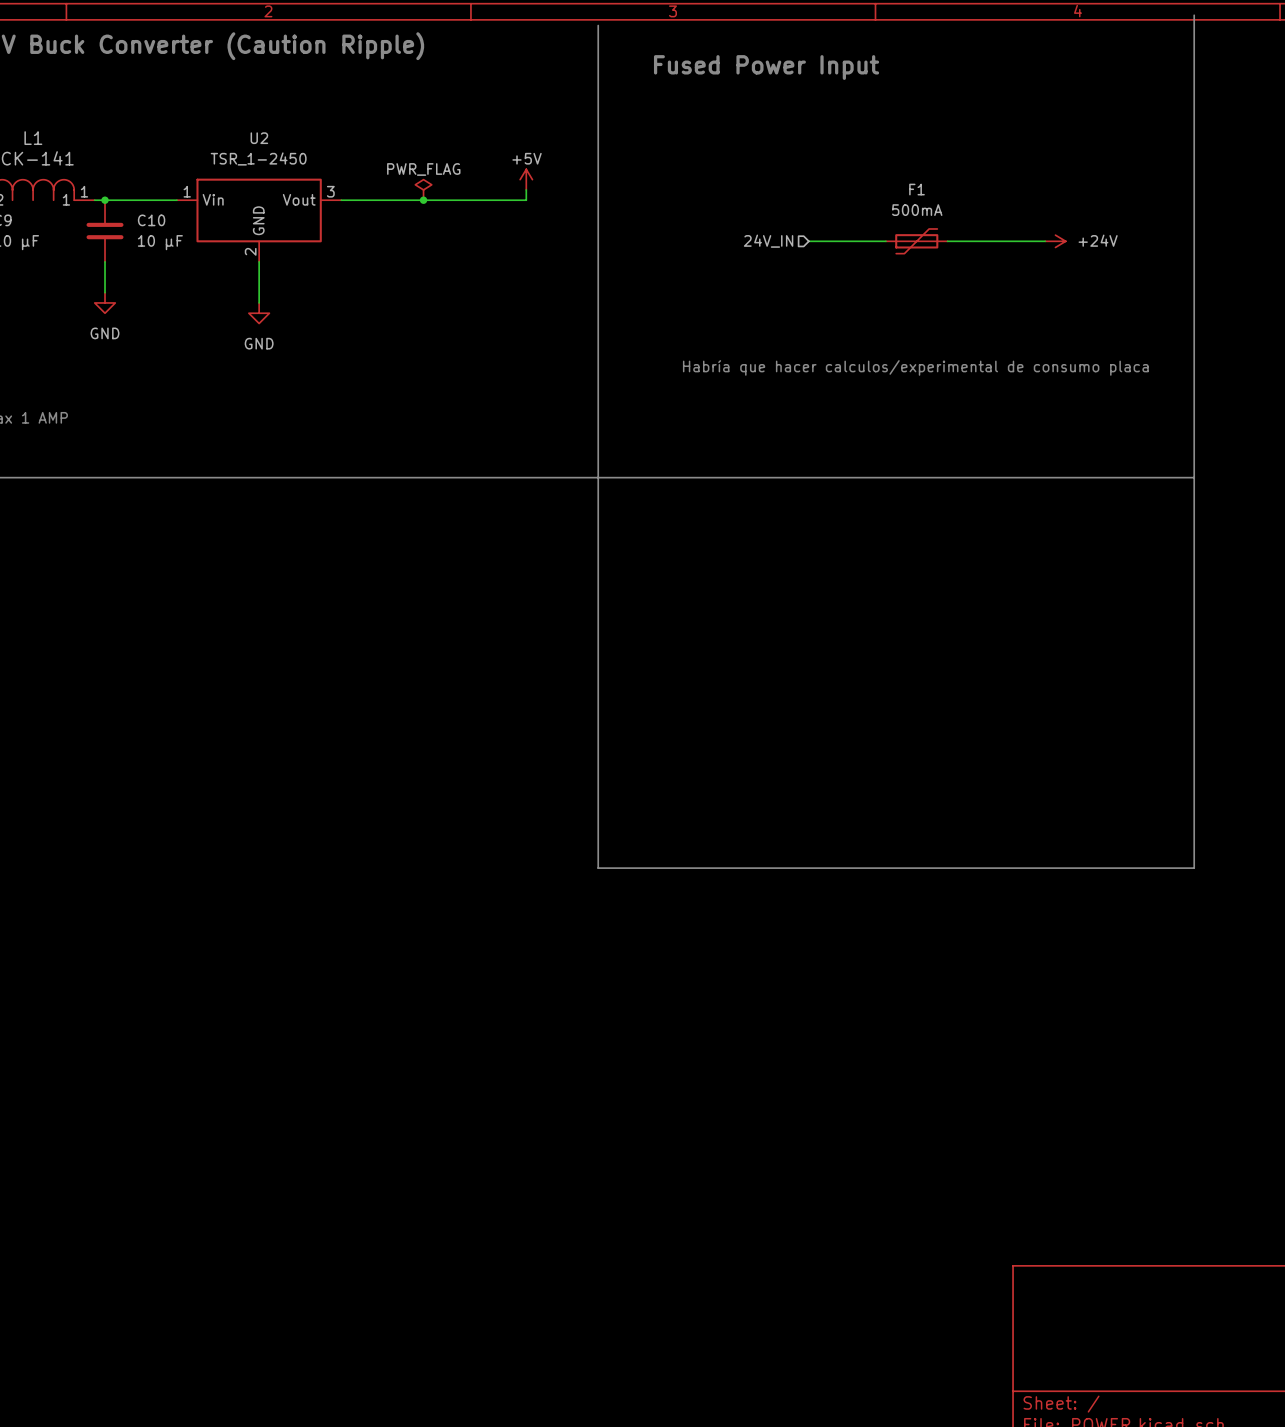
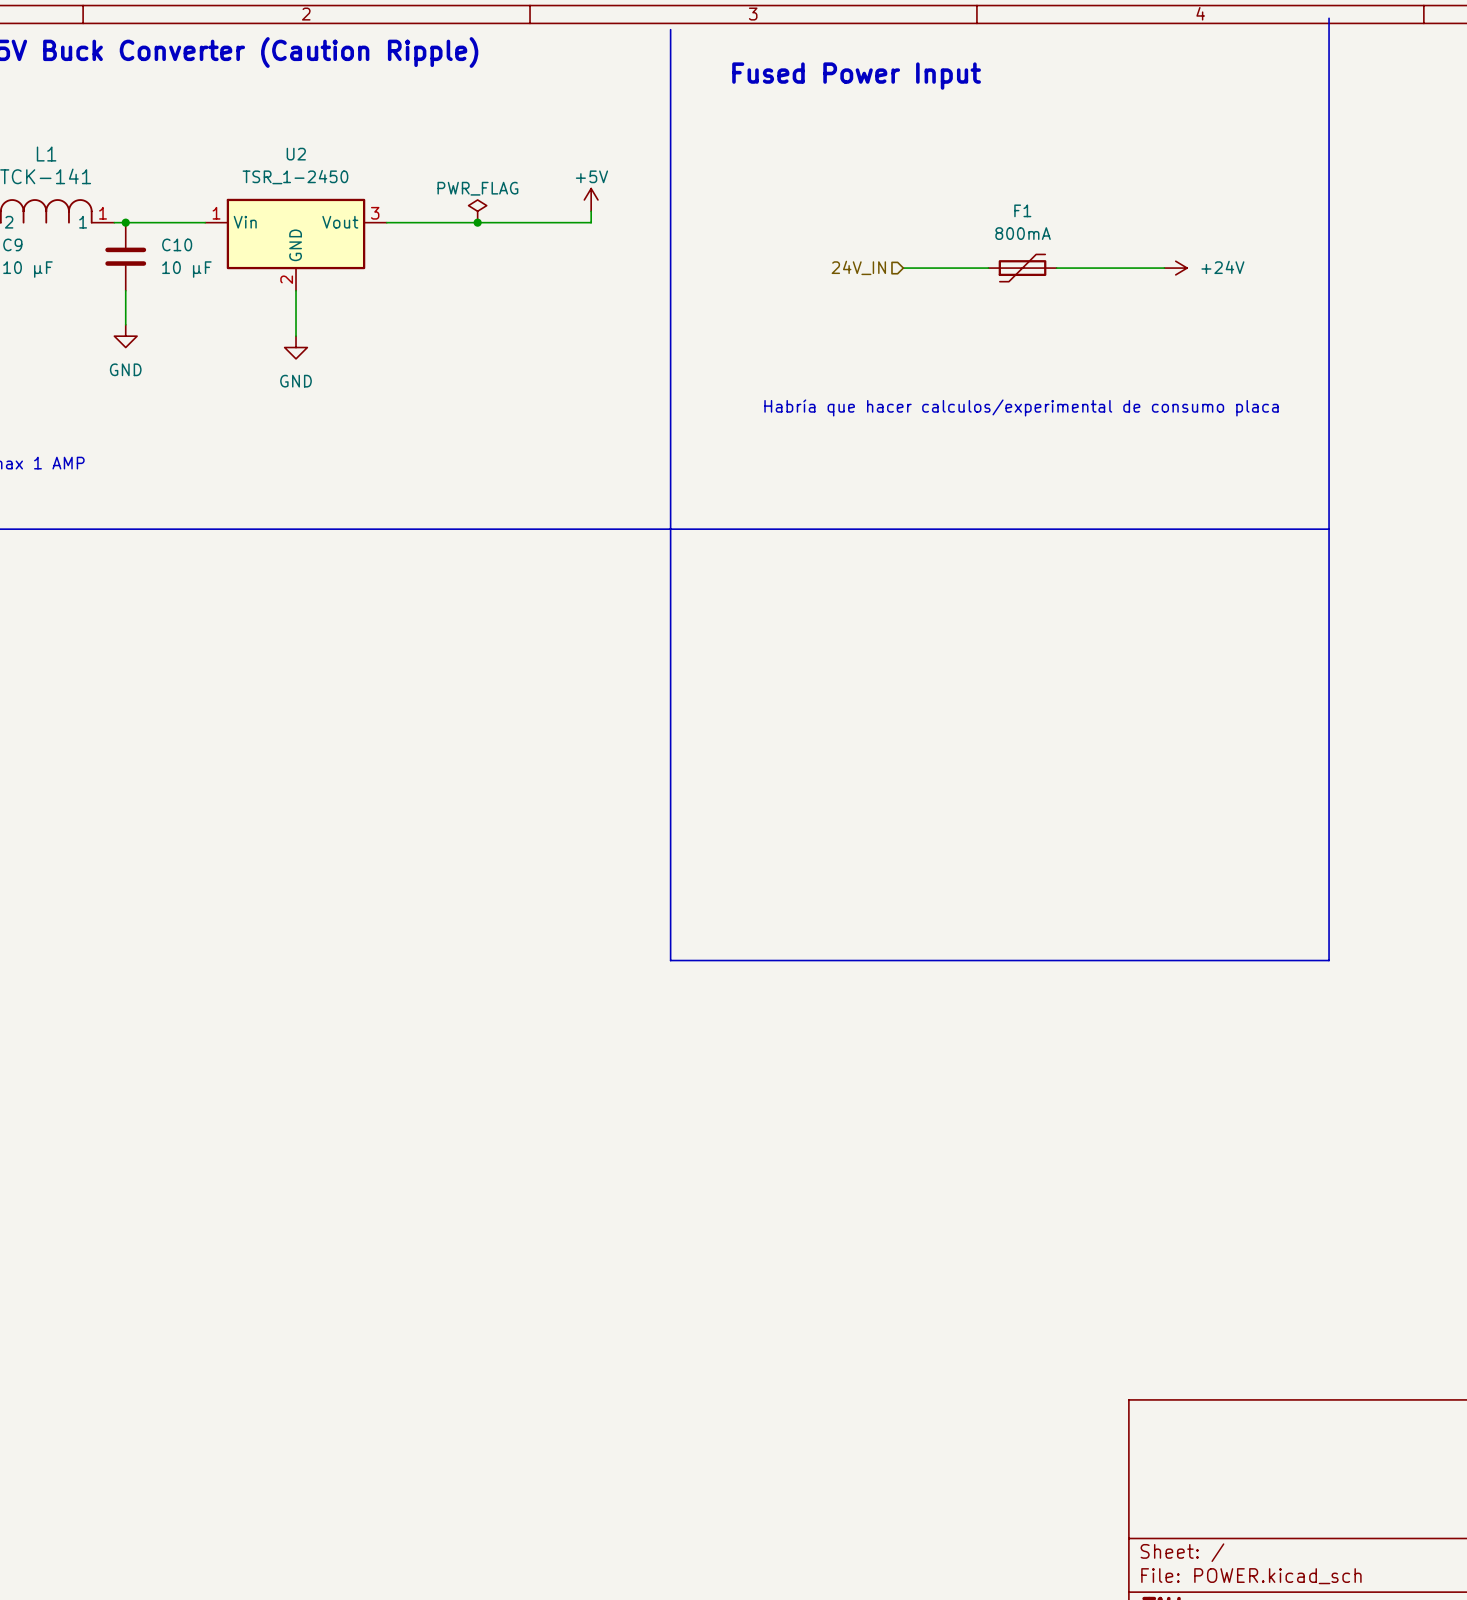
F1 value: 500mA (917, 210) -> 800mA (1023, 233)

